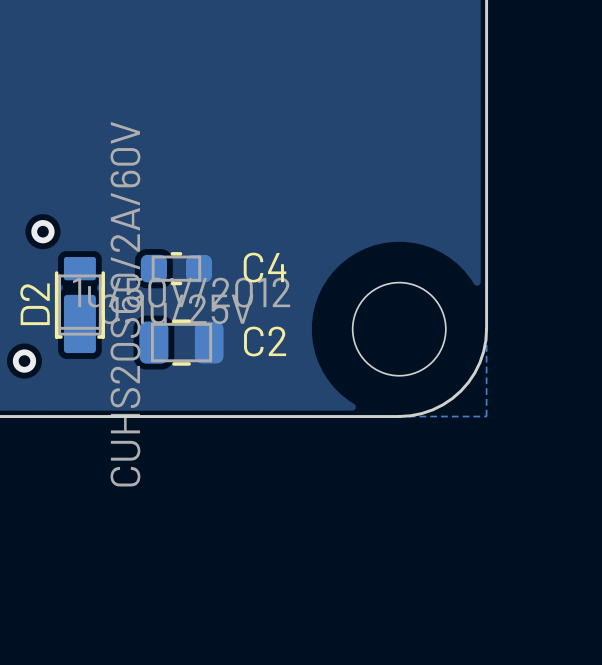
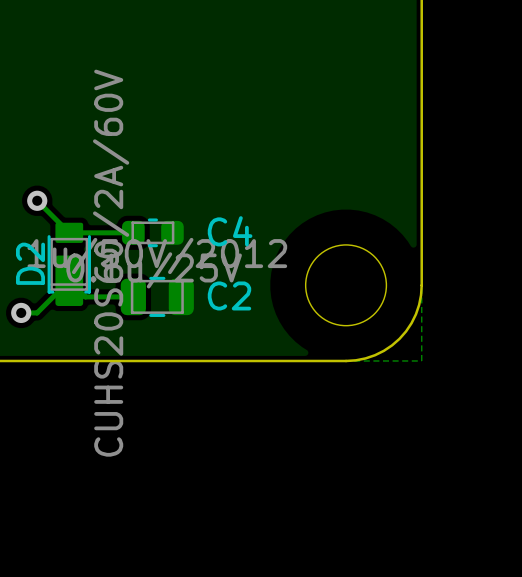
track: none -> (37, 200) (69, 232) (133, 232)
track: none -> (133, 296) (85, 296) (69, 280) (37, 312) (21, 312)

